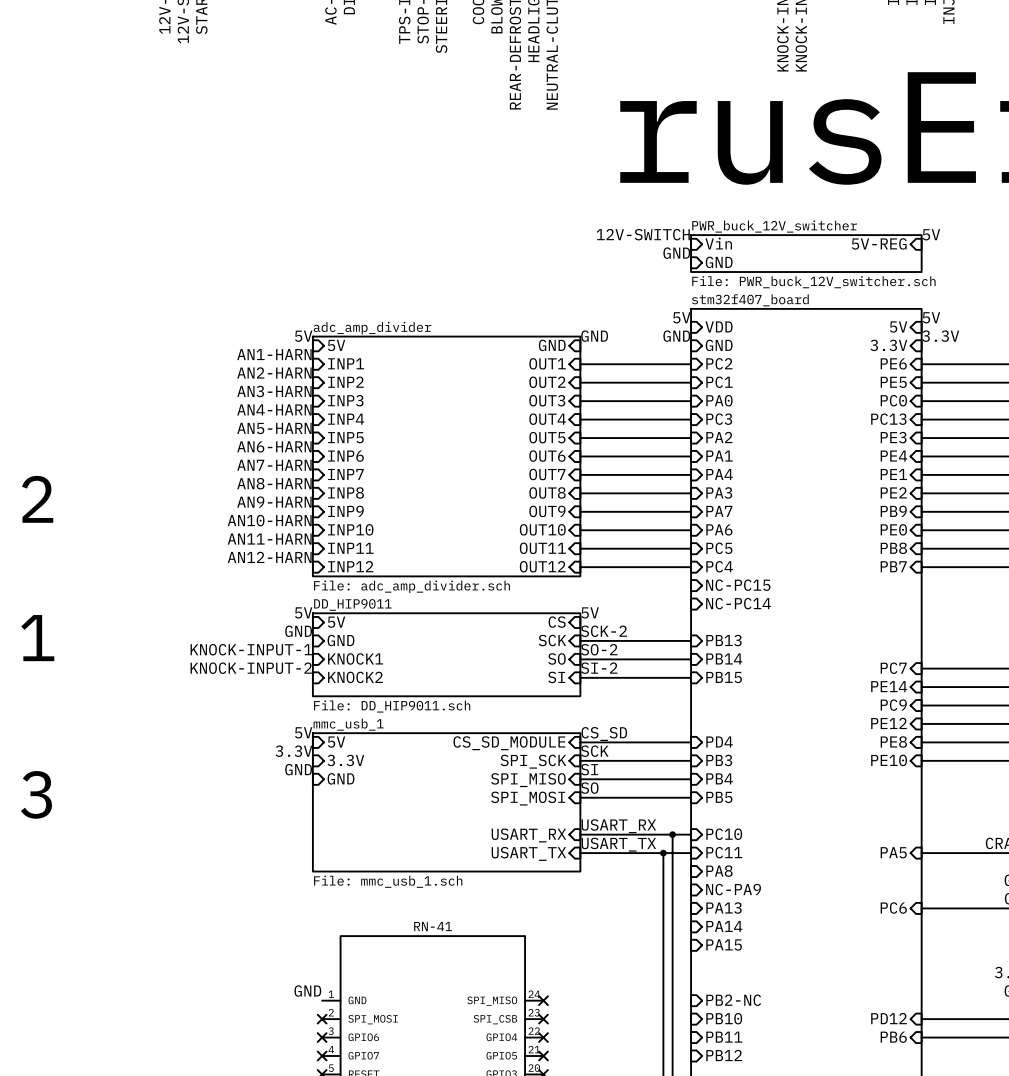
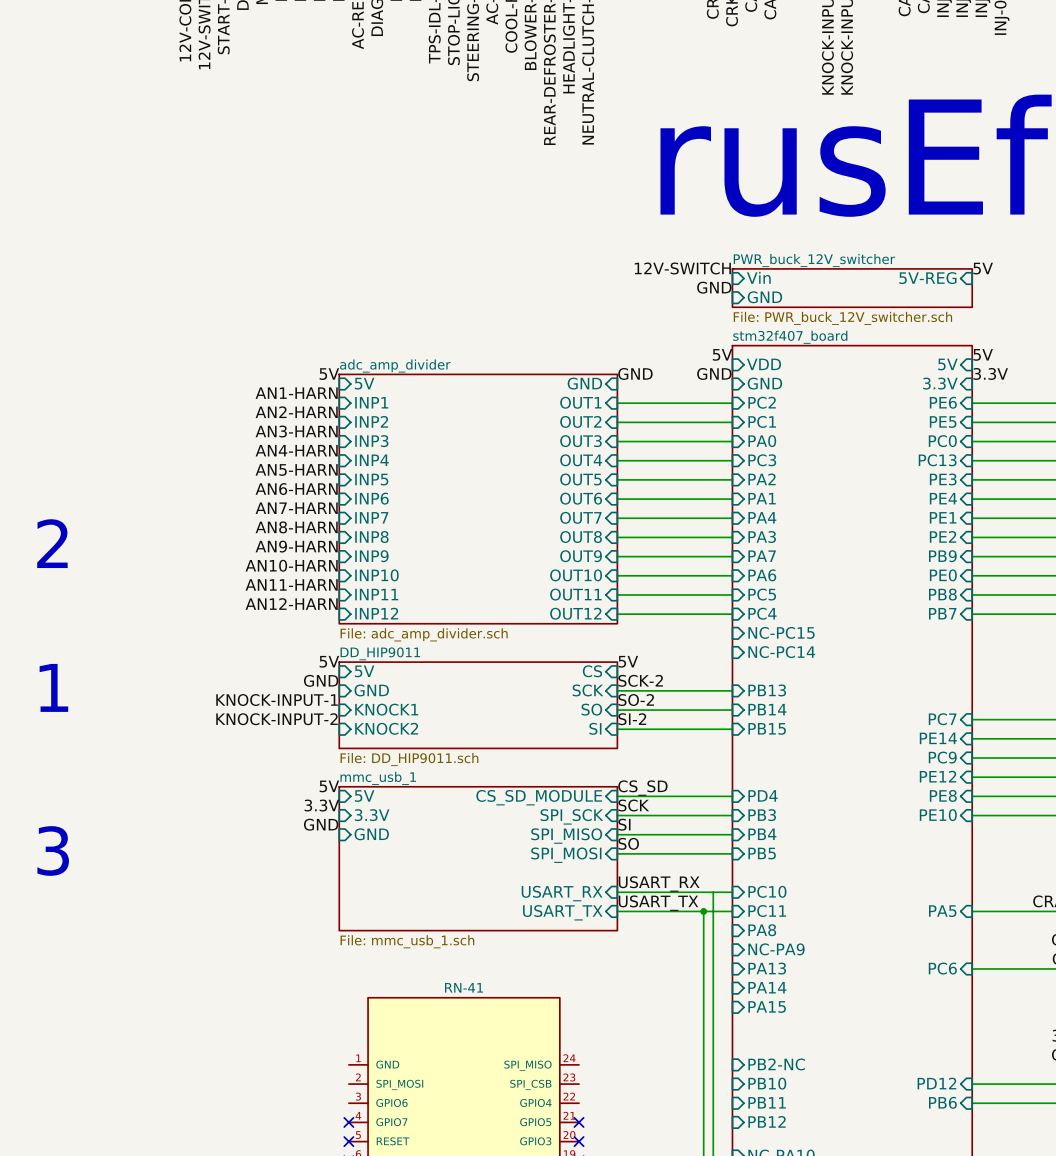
junction: (672, 834) -> none
label: GND (307, 991) -> none
no-connect mark: (543, 1000) -> none
no-connect mark: (322, 1019) -> none
no-connect mark: (543, 1019) -> none
no-connect mark: (322, 1037) -> none
no-connect mark: (543, 1037) -> none

